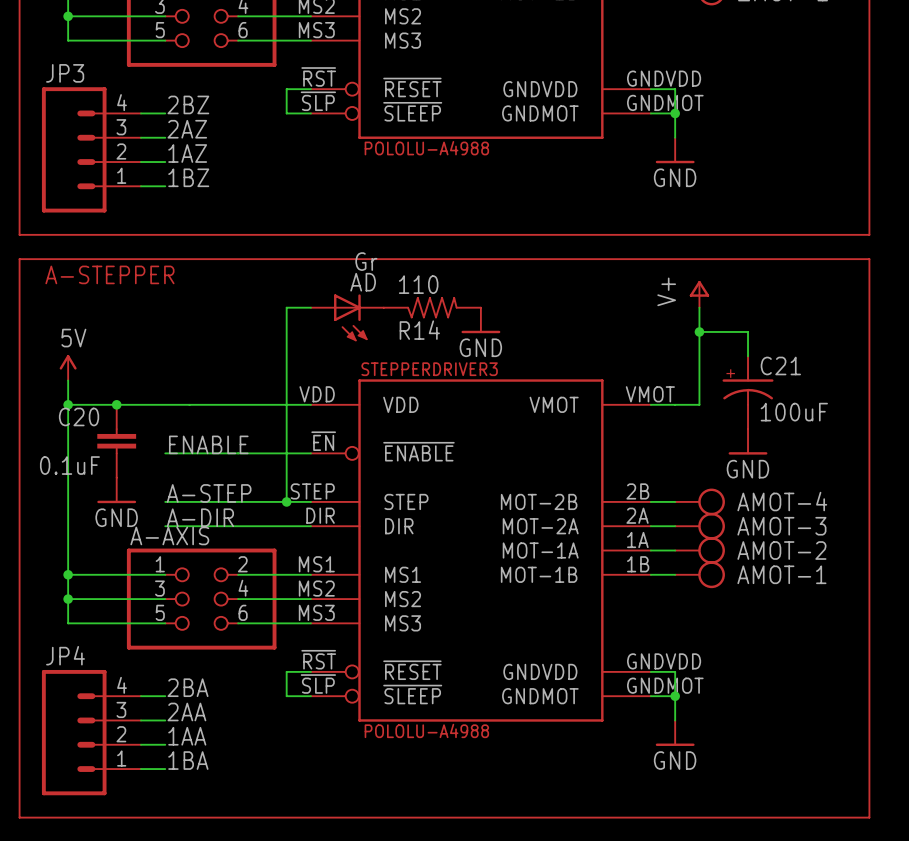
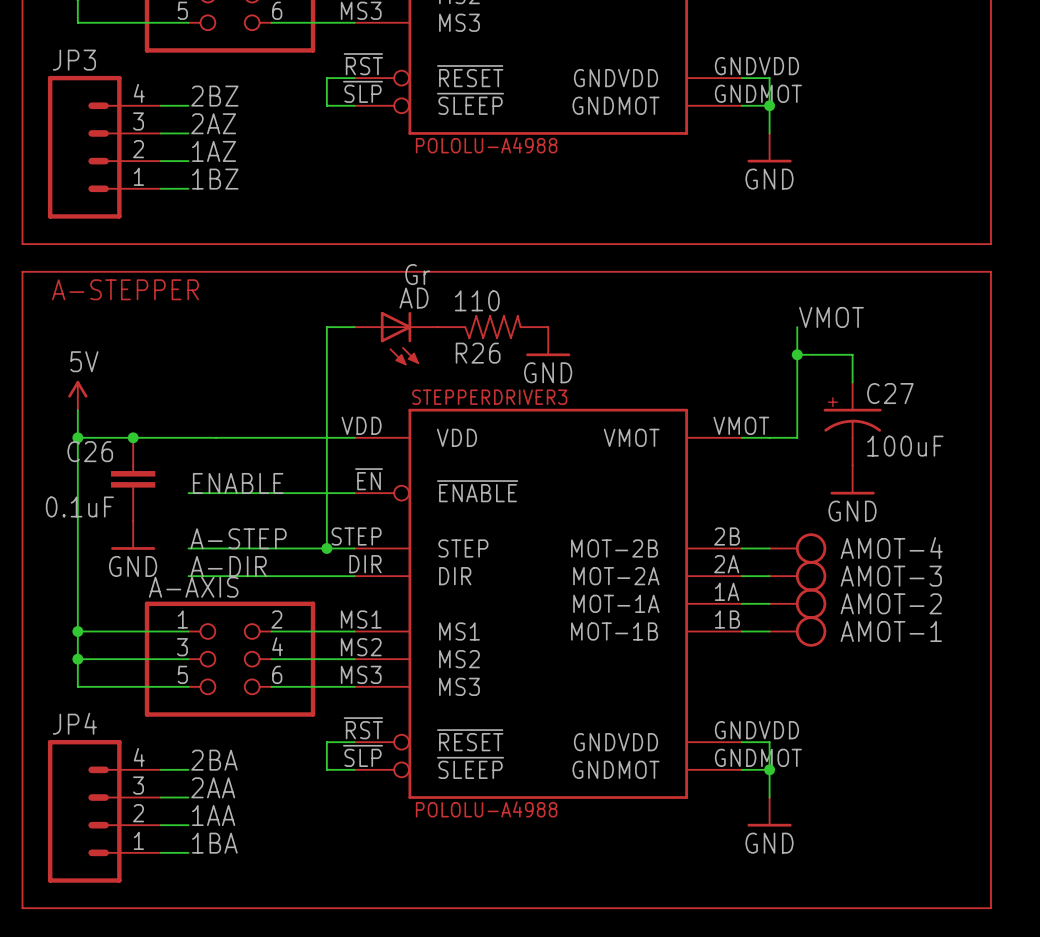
power symbol: V+ (699, 294) -> none
label: none -> VMOT (831, 317)
R14 name: R14 (419, 330) -> R26 (478, 353)
C21 name: C21 (780, 365) -> C27 (890, 393)
C20 name: C20 (79, 416) -> C26 (90, 451)

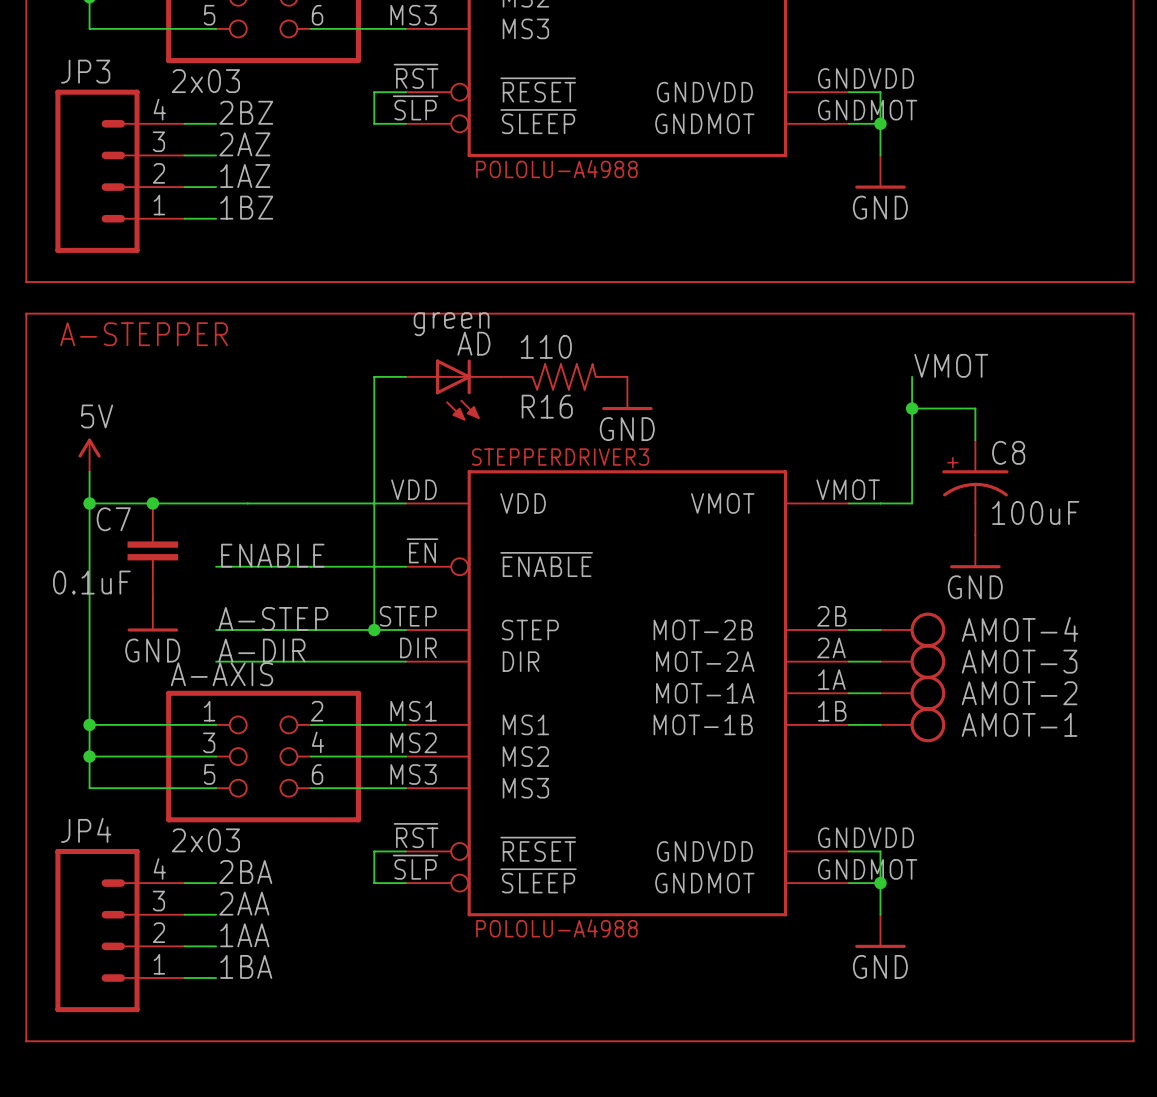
part value: none -> 2x03 (205, 81)
AD value: Gr (417, 274) -> green (451, 324)
R26 name: R26 (478, 353) -> R16 (547, 406)
C27 name: C27 (890, 393) -> C8 (1008, 452)
C26 name: C26 (90, 451) -> C7 (113, 519)
A-AXIS value: none -> 2x03 (205, 840)

